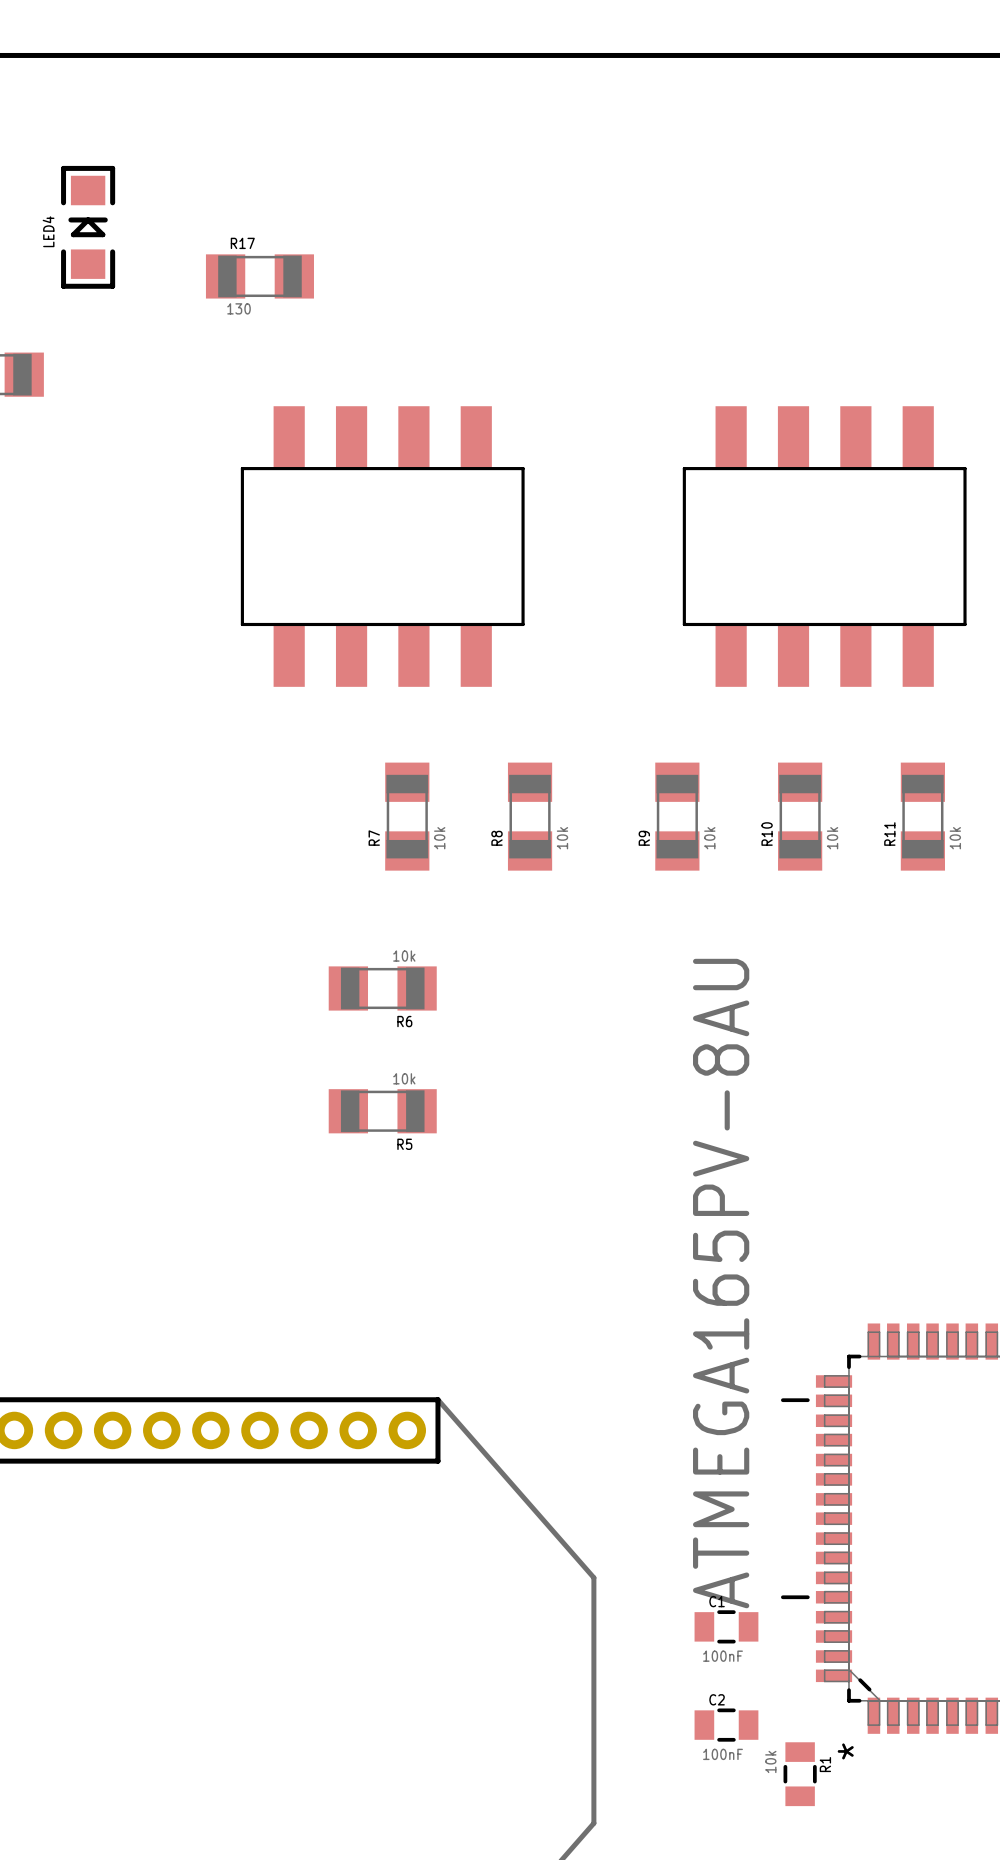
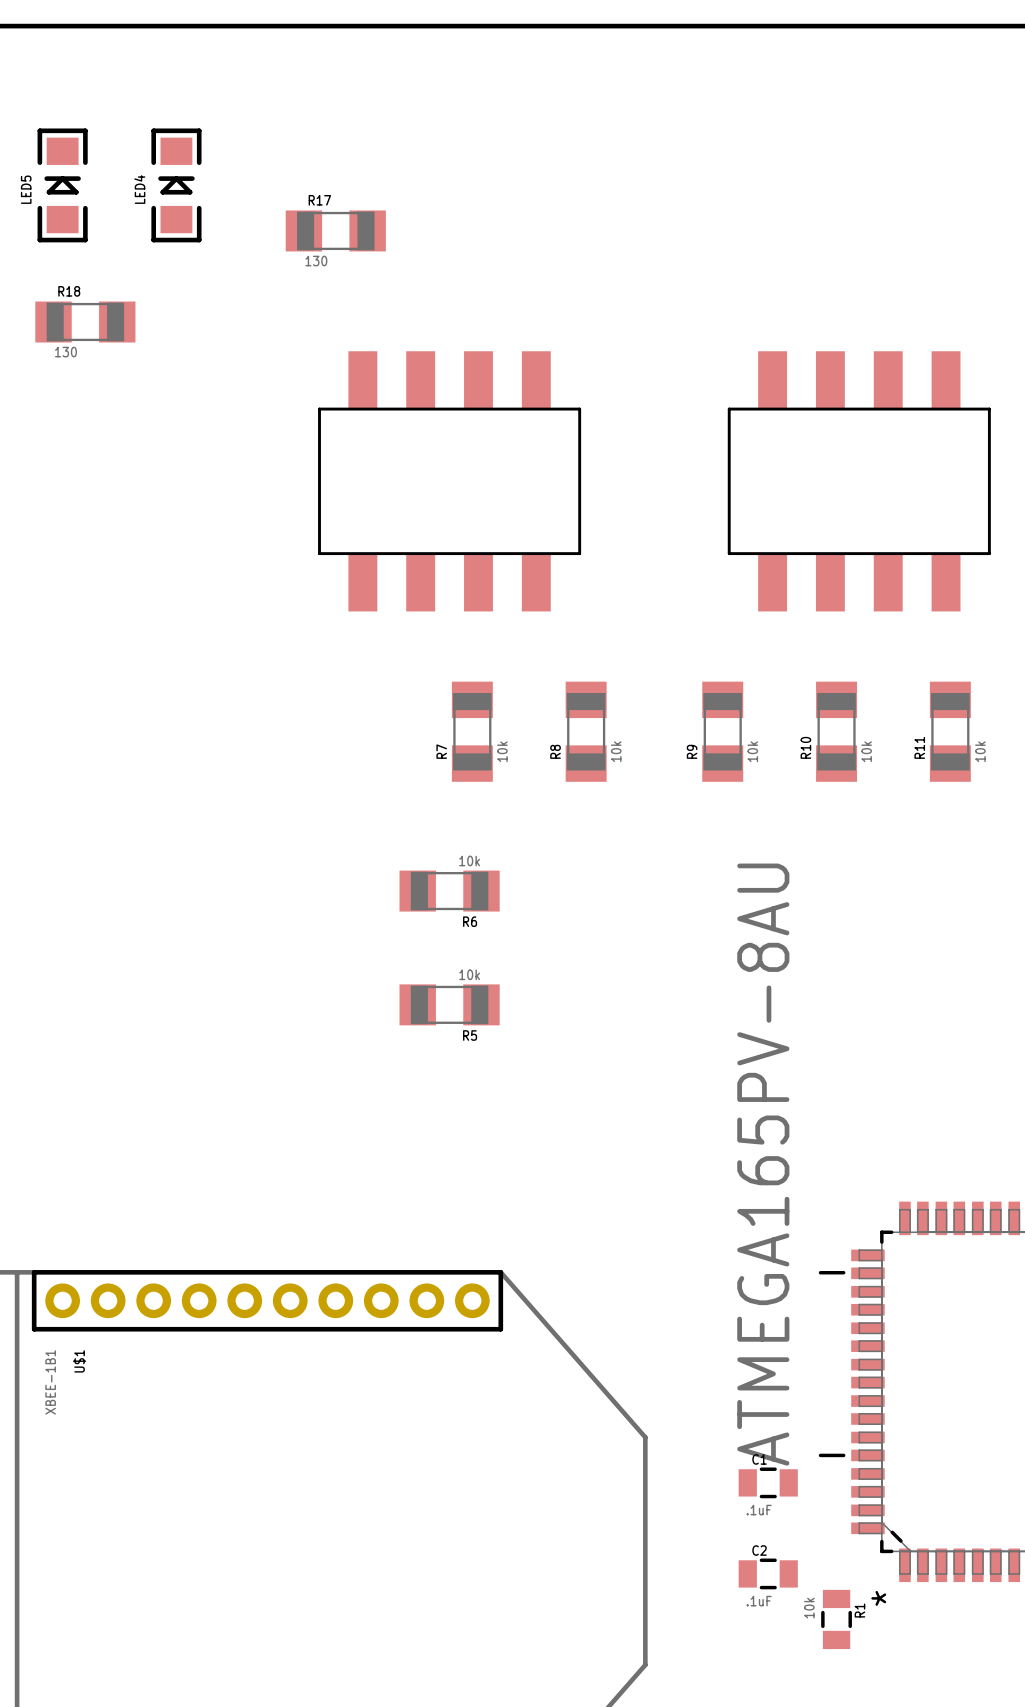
C1 value: 100nF (723, 1656) -> .1uF (759, 1510)
C2 value: 100nF (723, 1754) -> .1uF (759, 1601)

